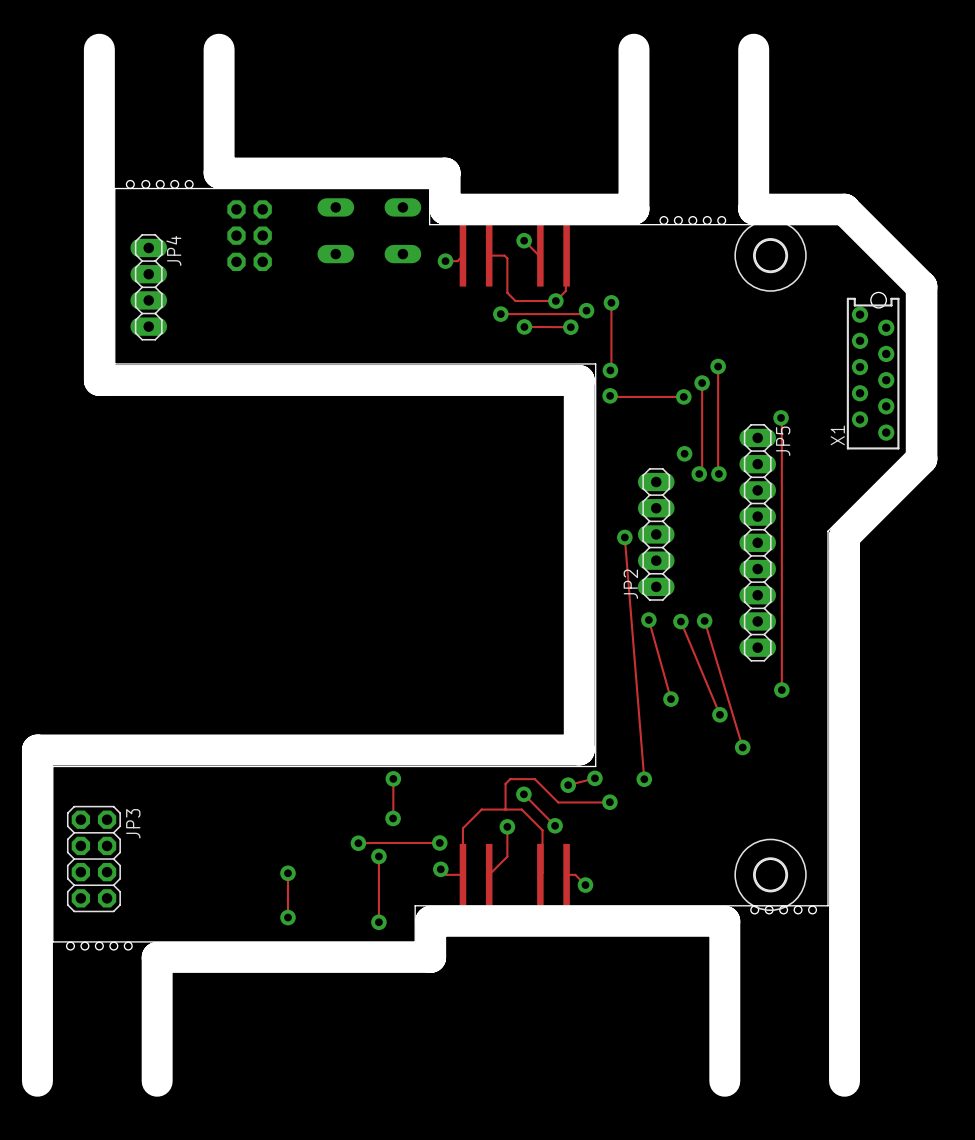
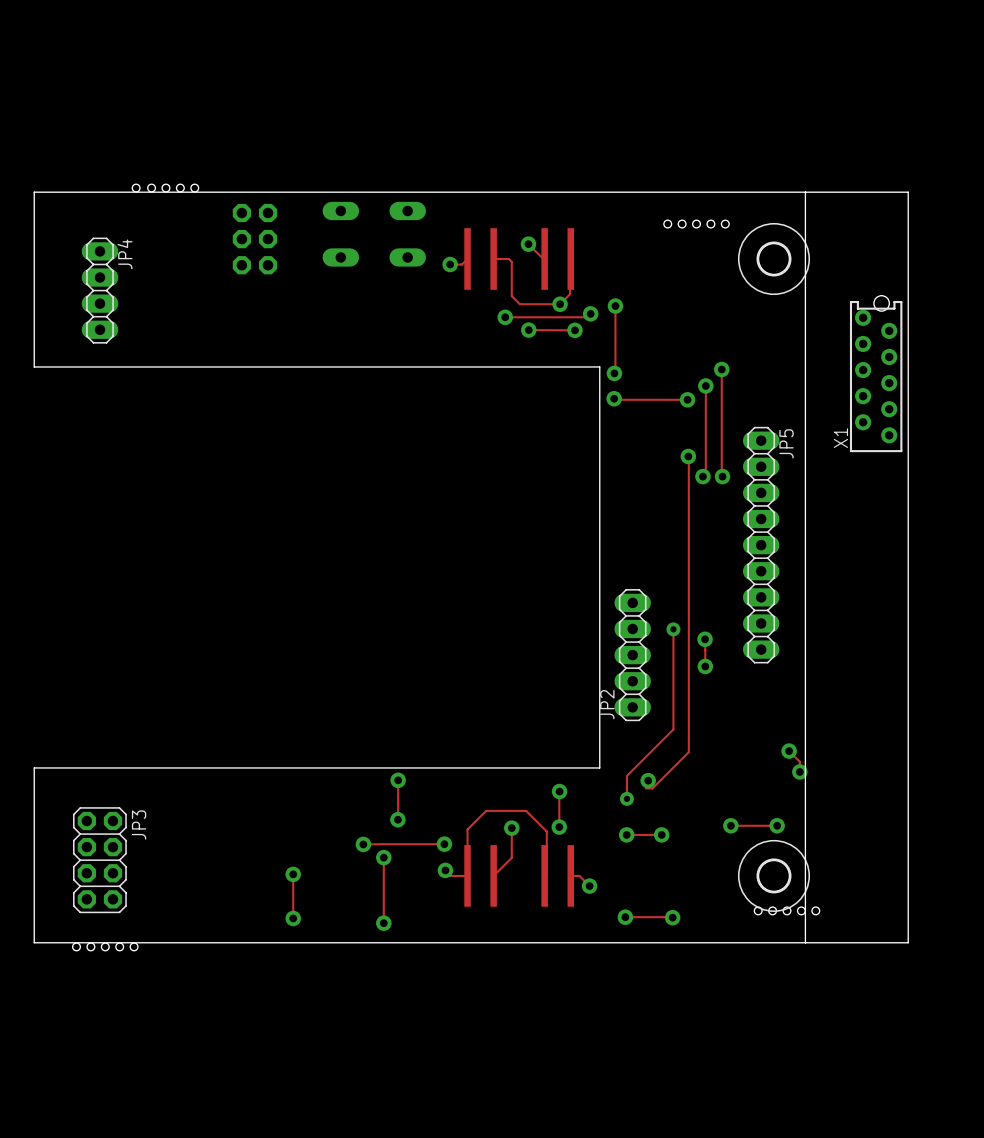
board edge: (99, 49) (99, 380) (579, 380) (579, 749) (37, 749) (37, 1081) -> none
board edge: (219, 49) (219, 173) (445, 173) (445, 209) (633, 209) (633, 49) -> none
board edge: (753, 49) (753, 209) (844, 209) (921, 286) (921, 458) (844, 536) (844, 1081) -> none
board edge: (114, 188) (114, 363) -> (120, 192) (34, 192) (34, 366) (120, 366)
board edge: (429, 188) (429, 224) (838, 224) (906, 292) (906, 452) (828, 531) (828, 905) (415, 905) (415, 941) -> (434, 192) (908, 192) (908, 942) (419, 942)
board edge: none -> (805, 192) (805, 942)
JP4 position: (148, 287) -> (99, 290)
track: (781, 417) (781, 690) -> none
via: (781, 417) -> none
track: none -> (688, 457) (688, 752) (652, 788) (645, 788)
JP2 position: (656, 534) -> (632, 655)
track: (624, 537) (644, 779) -> none
via: (624, 537) -> none
track: (648, 620) (670, 699) -> none
via: (648, 620) -> none
track: (704, 620) (742, 747) -> none
via: (704, 620) -> none
track: (680, 621) (719, 714) -> none
via: (680, 621) -> none
track: none -> (673, 629) (673, 729) (626, 775) (626, 798)
via: none -> (673, 629)
track: none -> (705, 639) (705, 666)
via: none -> (705, 639)
via: none -> (705, 666)
via: (781, 690) -> none
via: (670, 699) -> none
via: (719, 714) -> none
via: (742, 747) -> none
track: none -> (789, 751) (799, 761) (799, 771)
via: none -> (789, 751)
board edge: (52, 766) (52, 941) -> (58, 767) (34, 767) (34, 942) (58, 942)
via: none -> (799, 771)
track: (594, 778) (568, 785) -> none
via: (594, 778) -> none
via position: (568, 785) -> (559, 791)
track: (523, 794) (555, 825) -> (559, 791) (559, 827)
via: (523, 794) -> none
via: none -> (626, 798)
track: (609, 802) (558, 802) (534, 779) (510, 779) (505, 783) (505, 809) -> none
via: (609, 802) -> none
track: none -> (730, 825) (777, 825)
via: none -> (730, 825)
via: none -> (777, 825)
track: none -> (626, 834) (661, 834)
via: none -> (626, 834)
via: none -> (661, 834)
track: none -> (625, 917) (672, 917)
via: none -> (625, 917)
via: none -> (672, 917)
board edge: (157, 1081) (157, 957) (430, 957) (430, 921) (724, 921) (724, 1081) -> none

